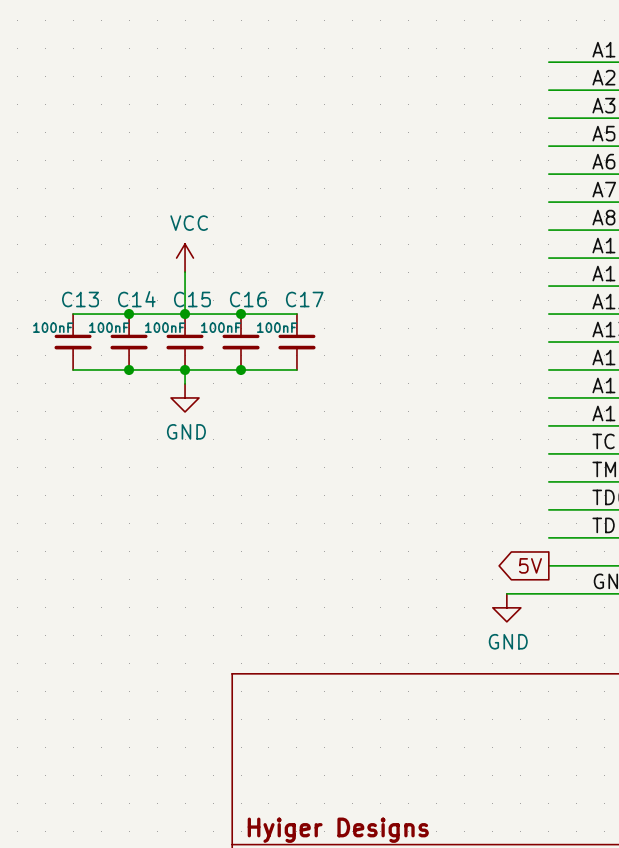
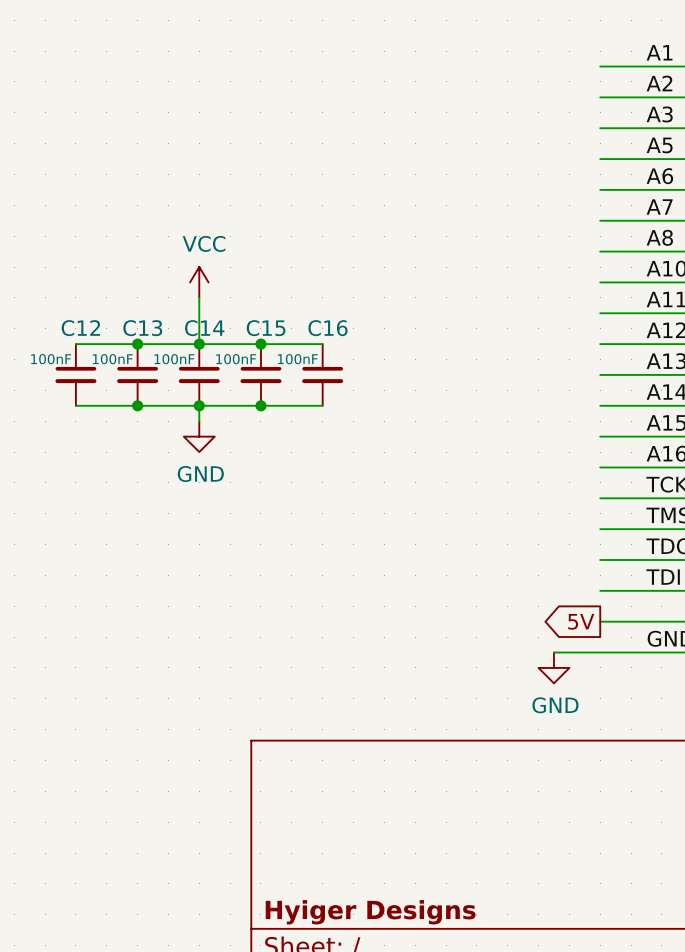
C13 name: C13 (80, 299) -> C12 (80, 328)
C14 name: C14 (136, 299) -> C13 (142, 328)
C15 name: C15 (192, 299) -> C14 (204, 328)
C16 name: C16 (248, 299) -> C15 (266, 328)
C17 name: C17 (304, 299) -> C16 (328, 328)

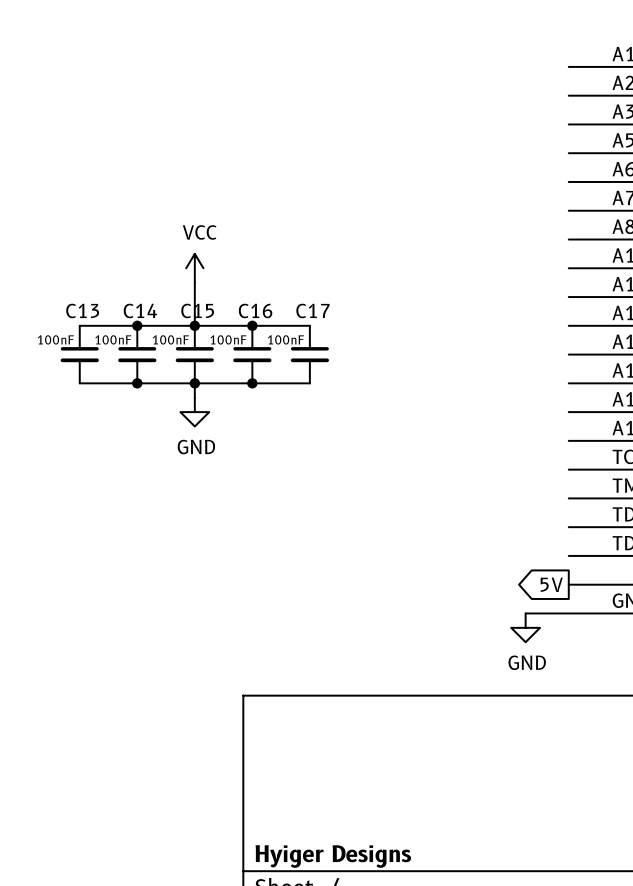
C12 name: C12 (80, 328) -> C13 (82, 310)
C13 name: C13 (142, 328) -> C14 (140, 310)
C14 name: C14 (204, 328) -> C15 (197, 310)
C15 name: C15 (266, 328) -> C16 (255, 310)
C16 name: C16 (328, 328) -> C17 (312, 310)

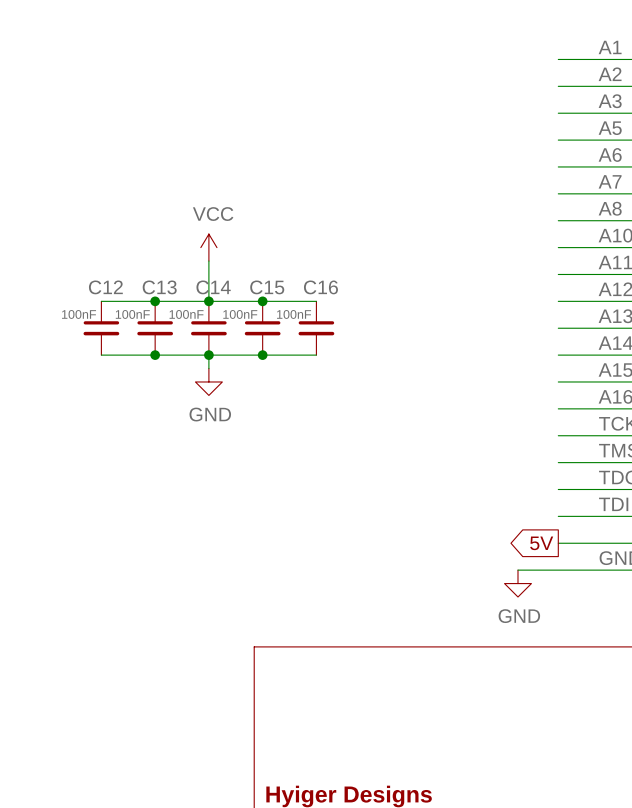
C13 name: C13 (82, 310) -> C12 (105, 287)
C14 name: C14 (140, 310) -> C13 (159, 287)
C15 name: C15 (197, 310) -> C14 (213, 287)
C16 name: C16 (255, 310) -> C15 (267, 287)
C17 name: C17 (312, 310) -> C16 (320, 287)

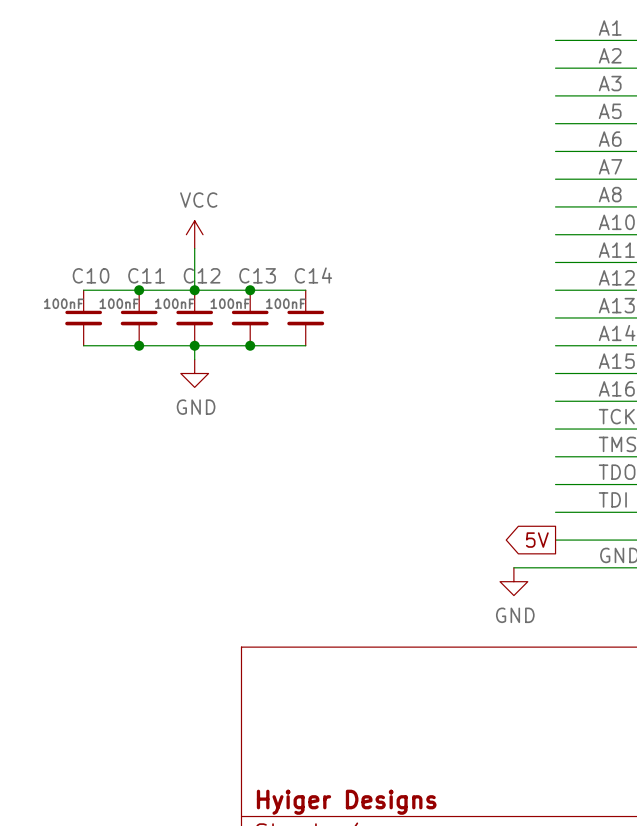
C12 name: C12 (105, 287) -> C10 (91, 275)
C13 name: C13 (159, 287) -> C11 (146, 275)
C14 name: C14 (213, 287) -> C12 (202, 275)
C15 name: C15 (267, 287) -> C13 (257, 275)
C16 name: C16 (320, 287) -> C14 (313, 275)

